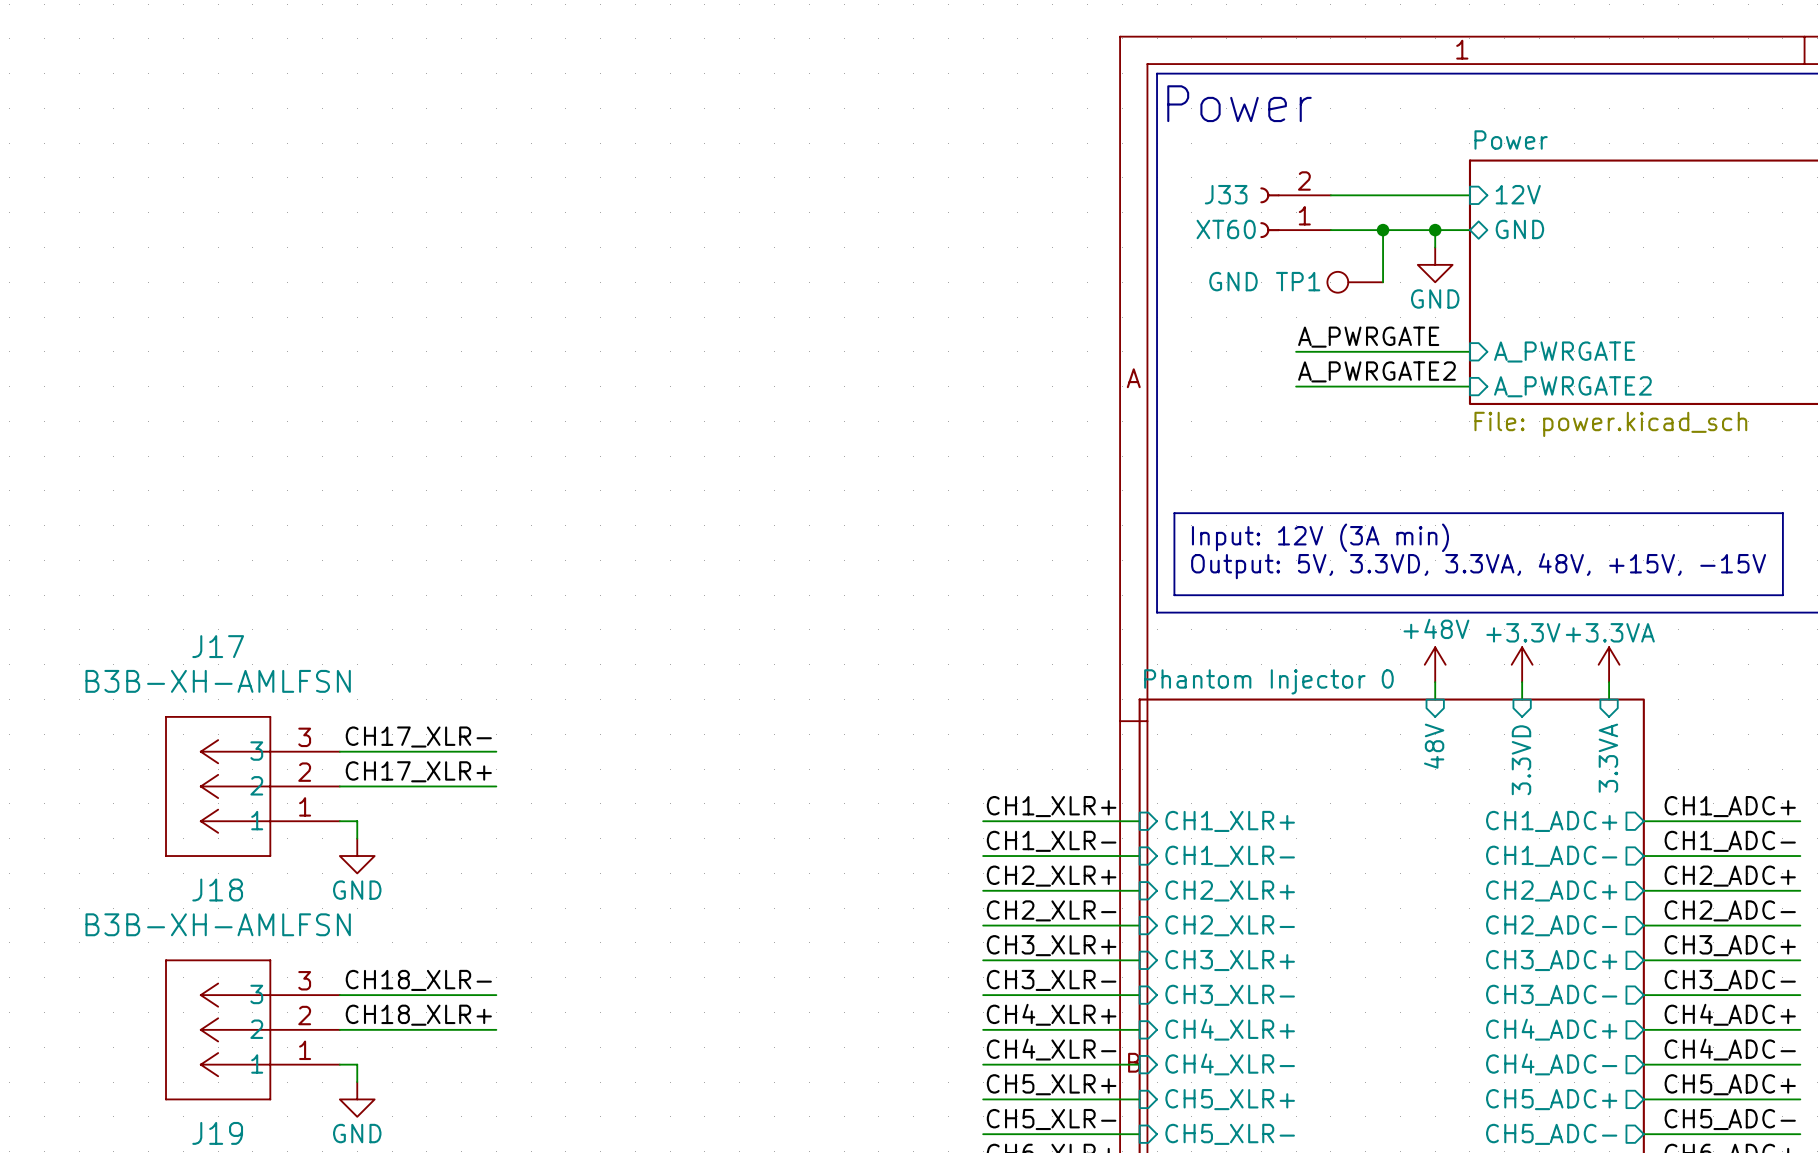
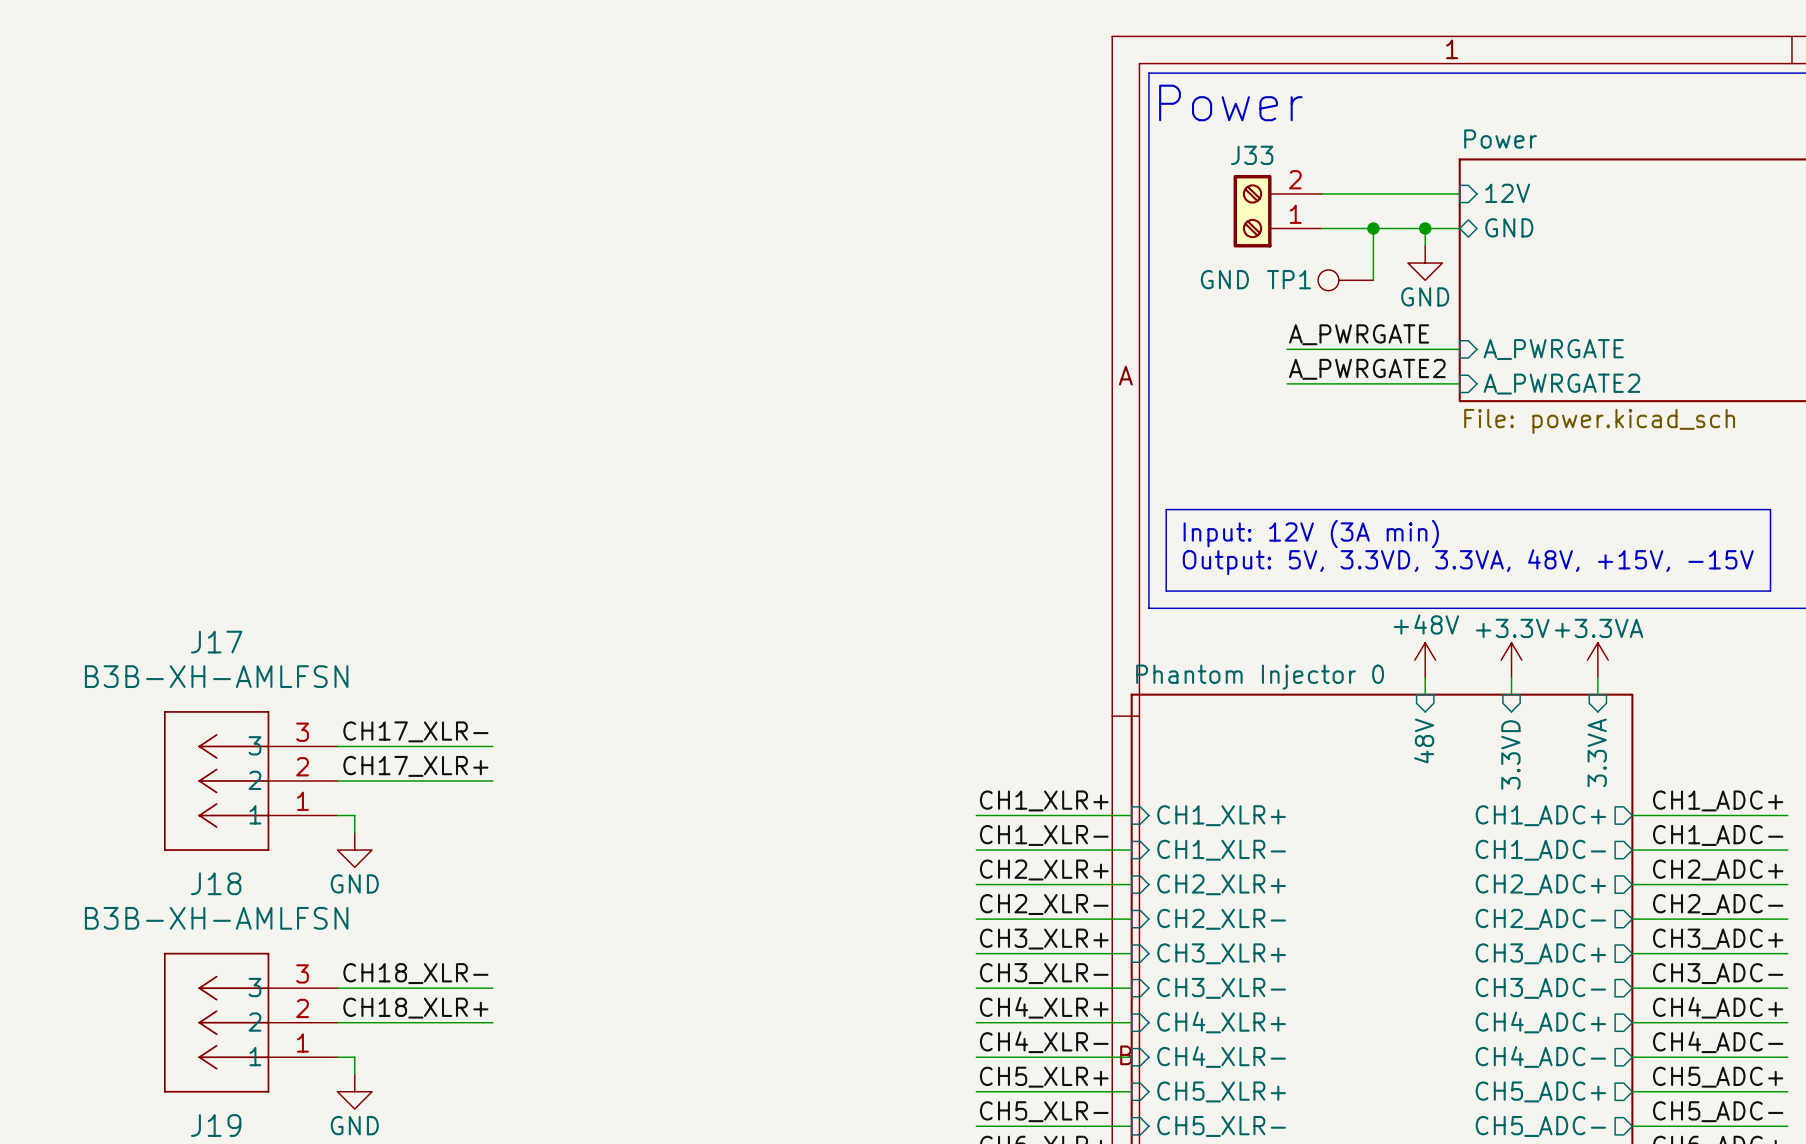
J33 symbol: [1260, 187, 1331, 239] -> [1233, 174, 1322, 248]
J33 name position: J33 (1226, 194) -> J33 (1252, 155)
J33 value: XT60 (1226, 229) -> none

